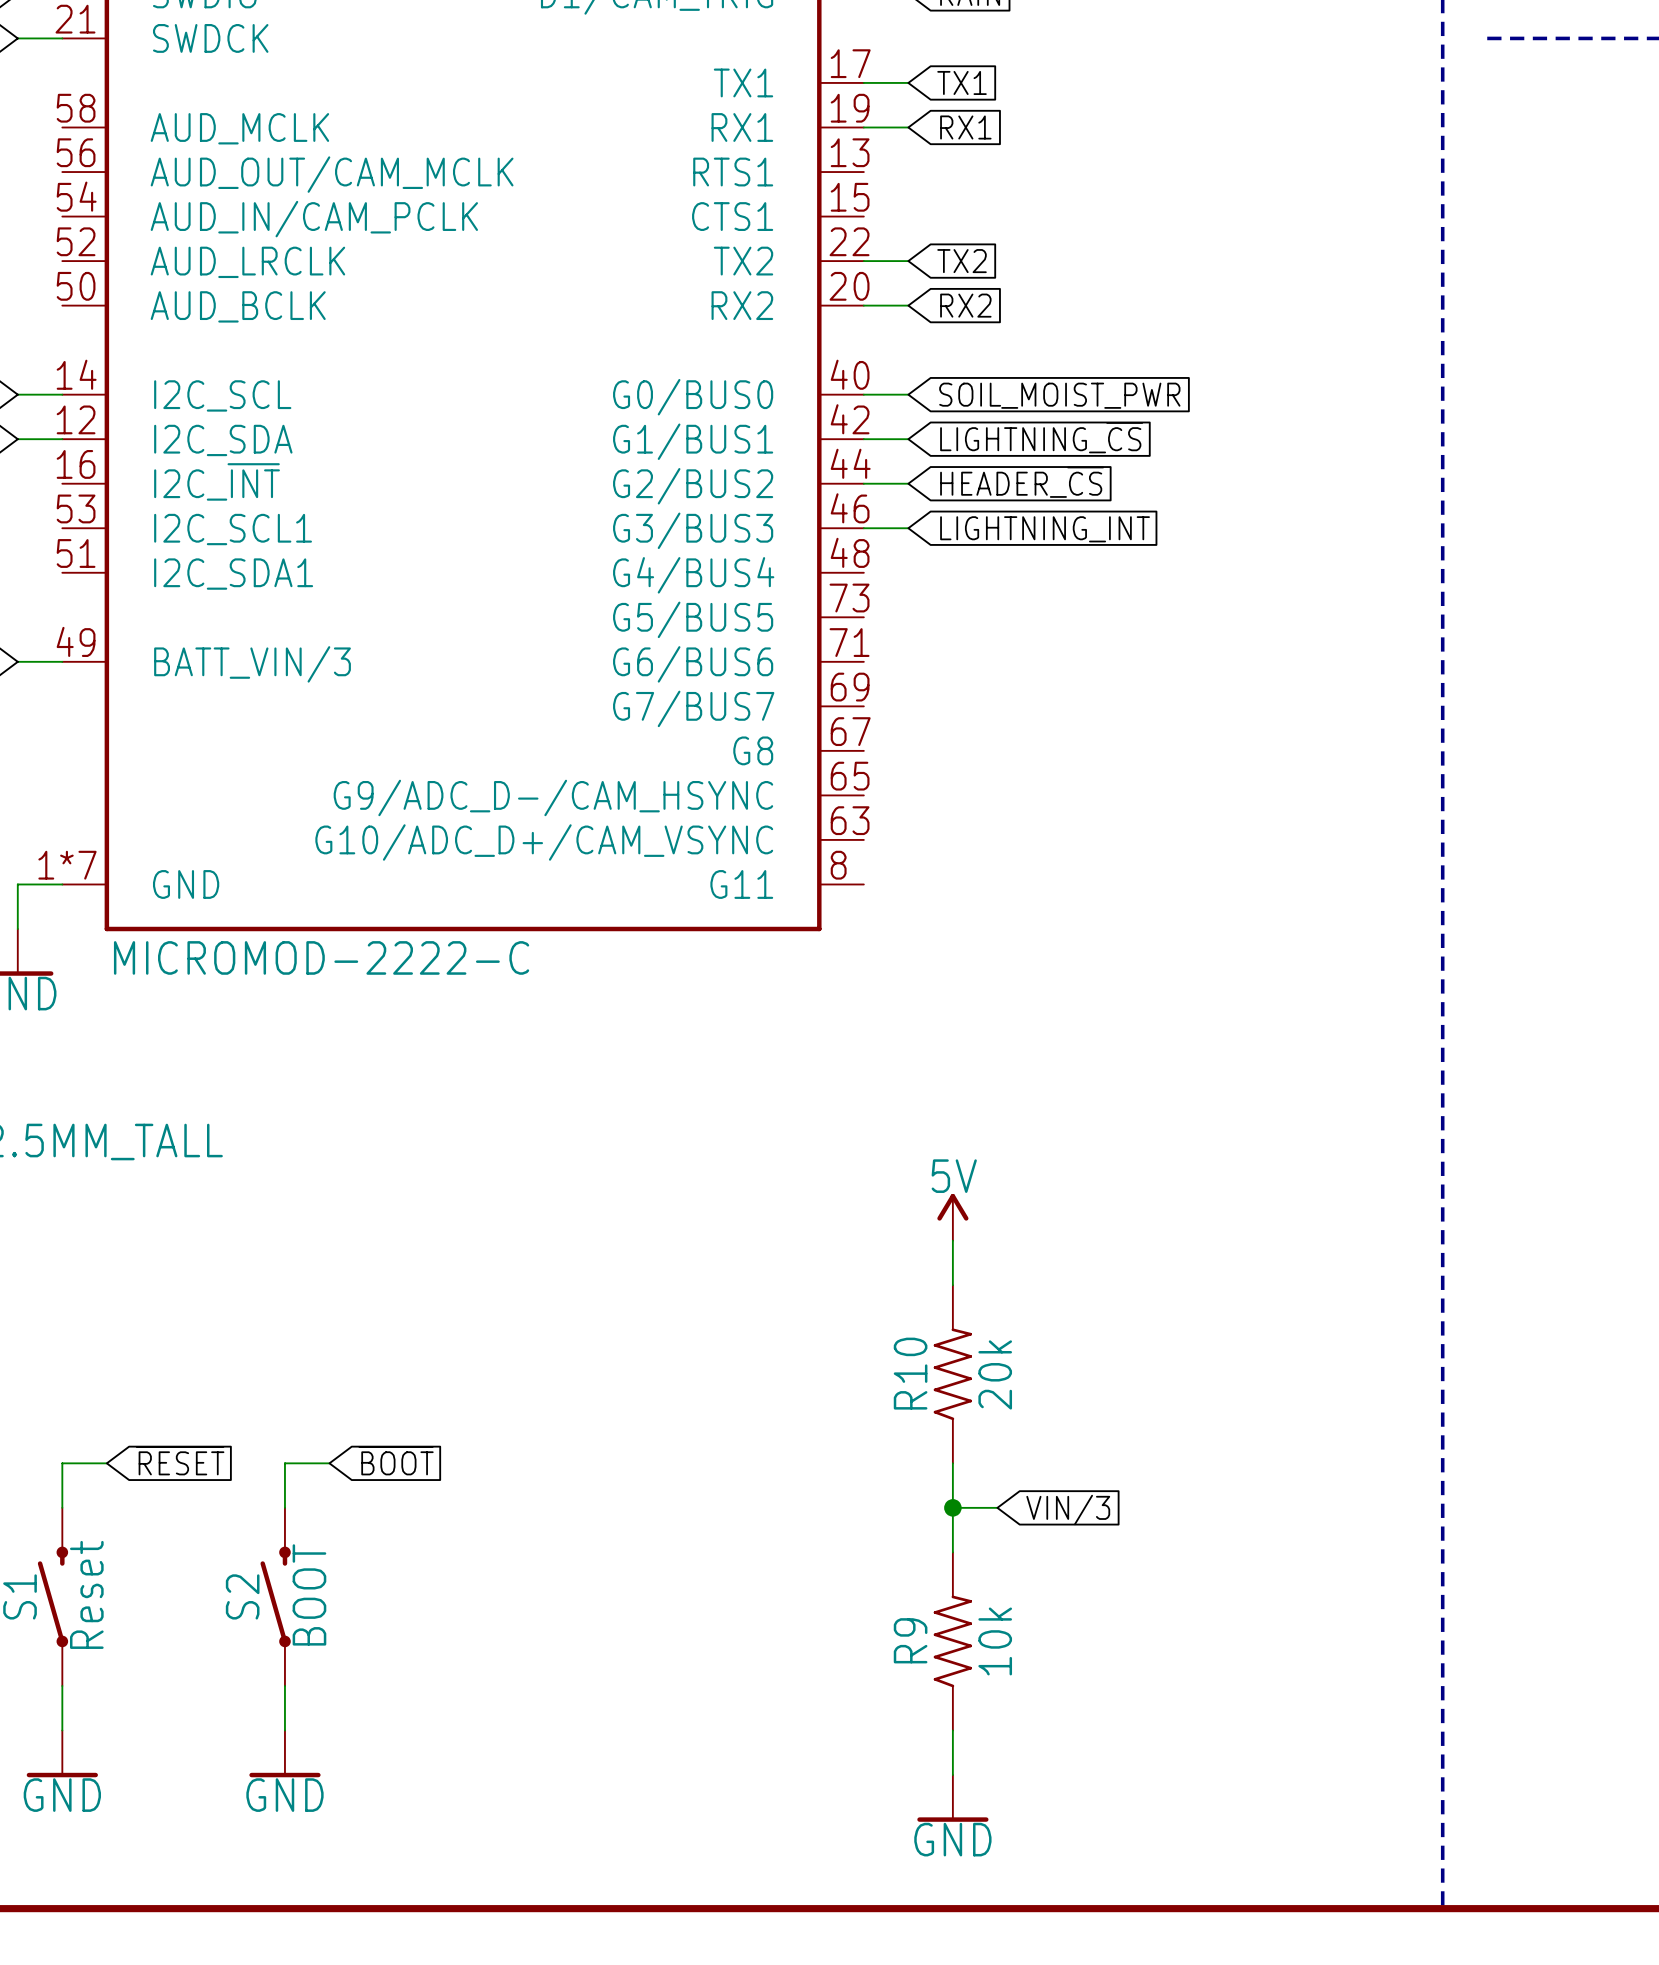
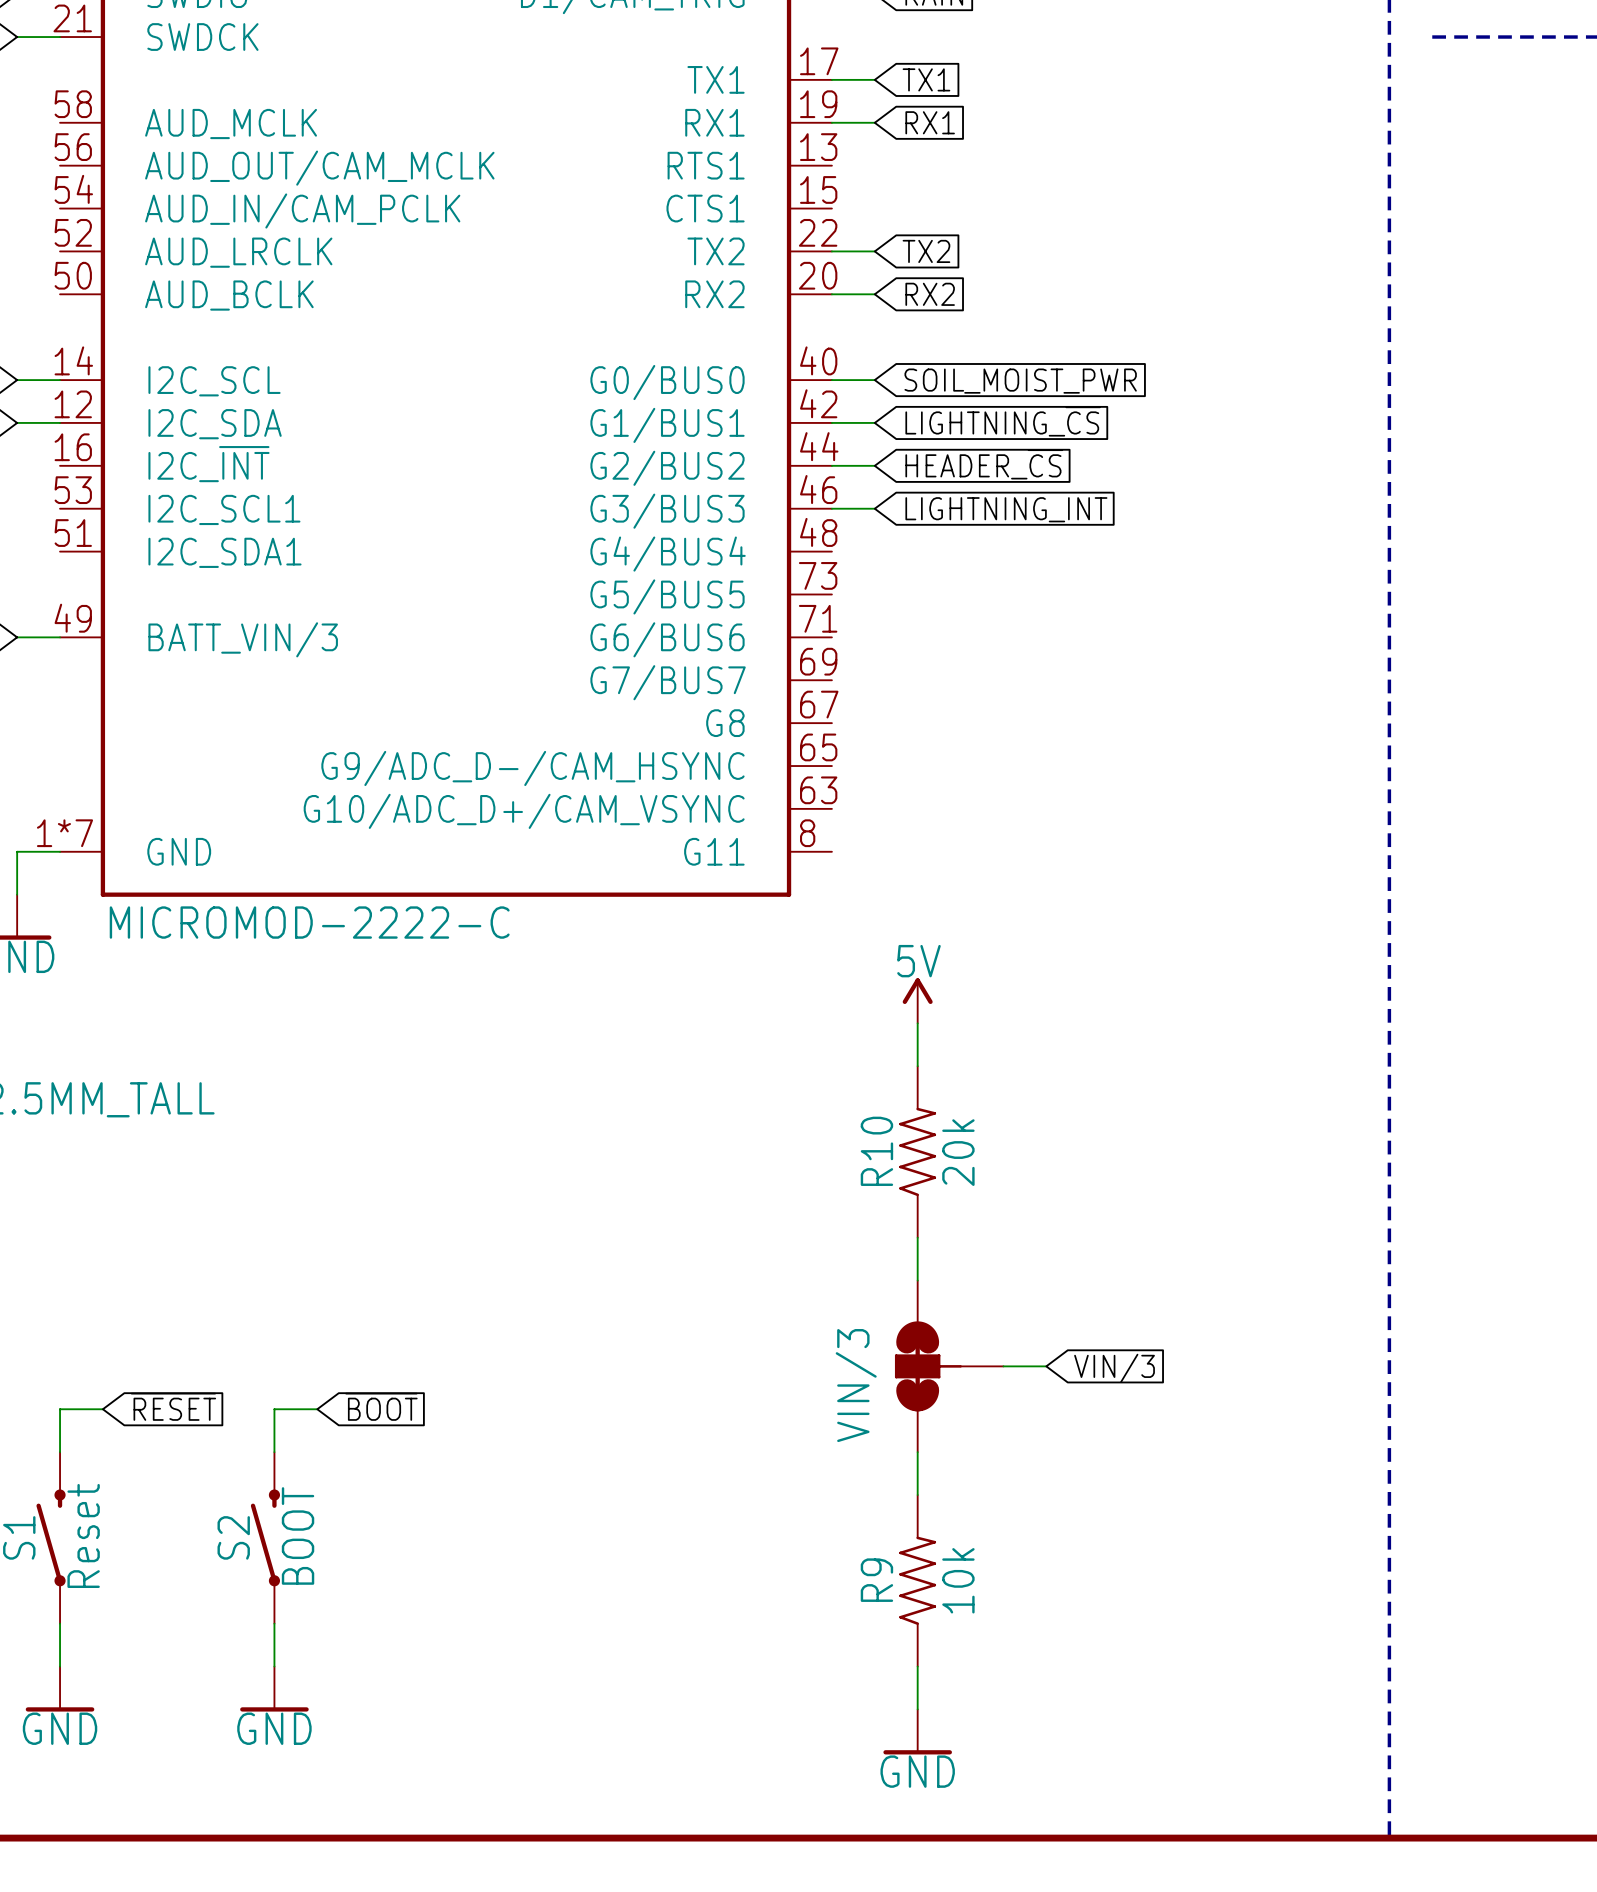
wire: none -> (917, 1023) (917, 1066)
power symbol position: 5V (952, 1217) -> 5V (917, 1000)
R10 position: (952, 1374) -> (917, 1151)
part: none -> VIN/3 (949, 1366)
wire: none -> (1003, 1366) (1046, 1366)
wire: (952, 1463) (952, 1507) (997, 1507) -> none
junction: (952, 1507) -> none
global label position: VIN/3 (1068, 1509) -> VIN/3 (1114, 1368)

